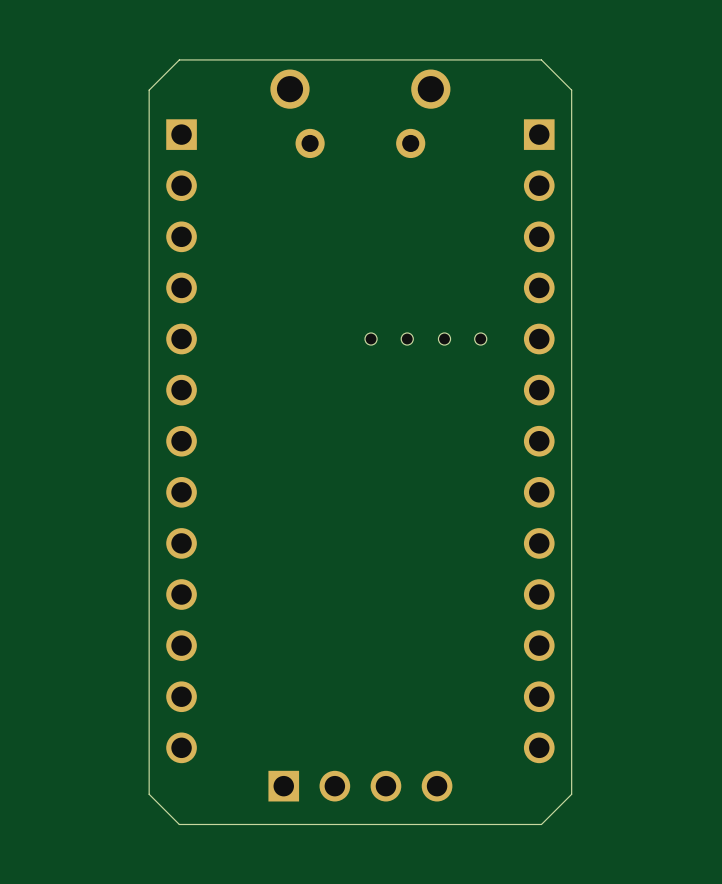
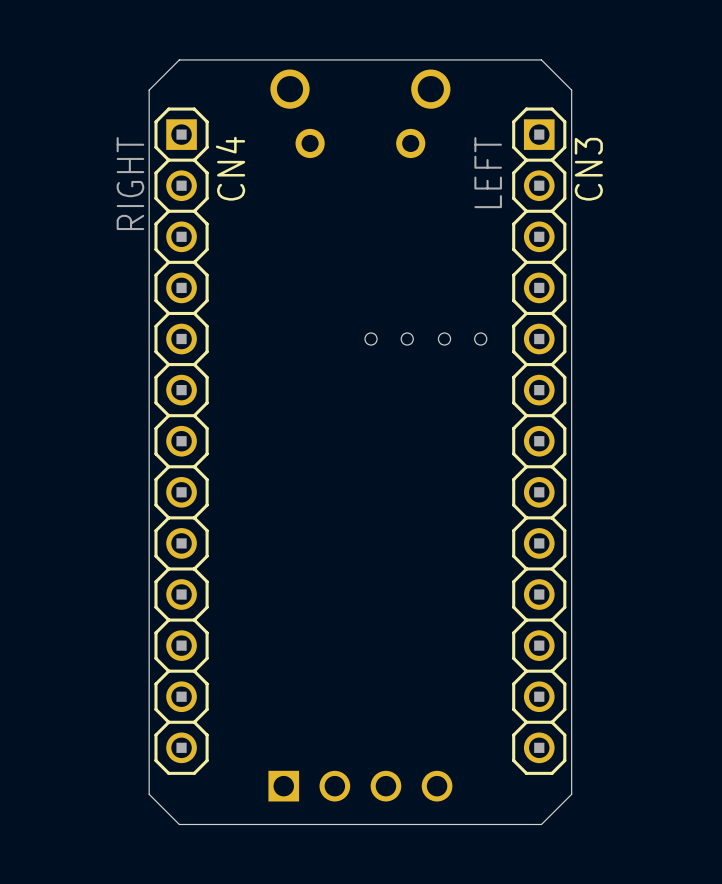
CN4 side: top (181, 441) -> bottom (181, 441)
CN3 side: top (539, 441) -> bottom (539, 441)

